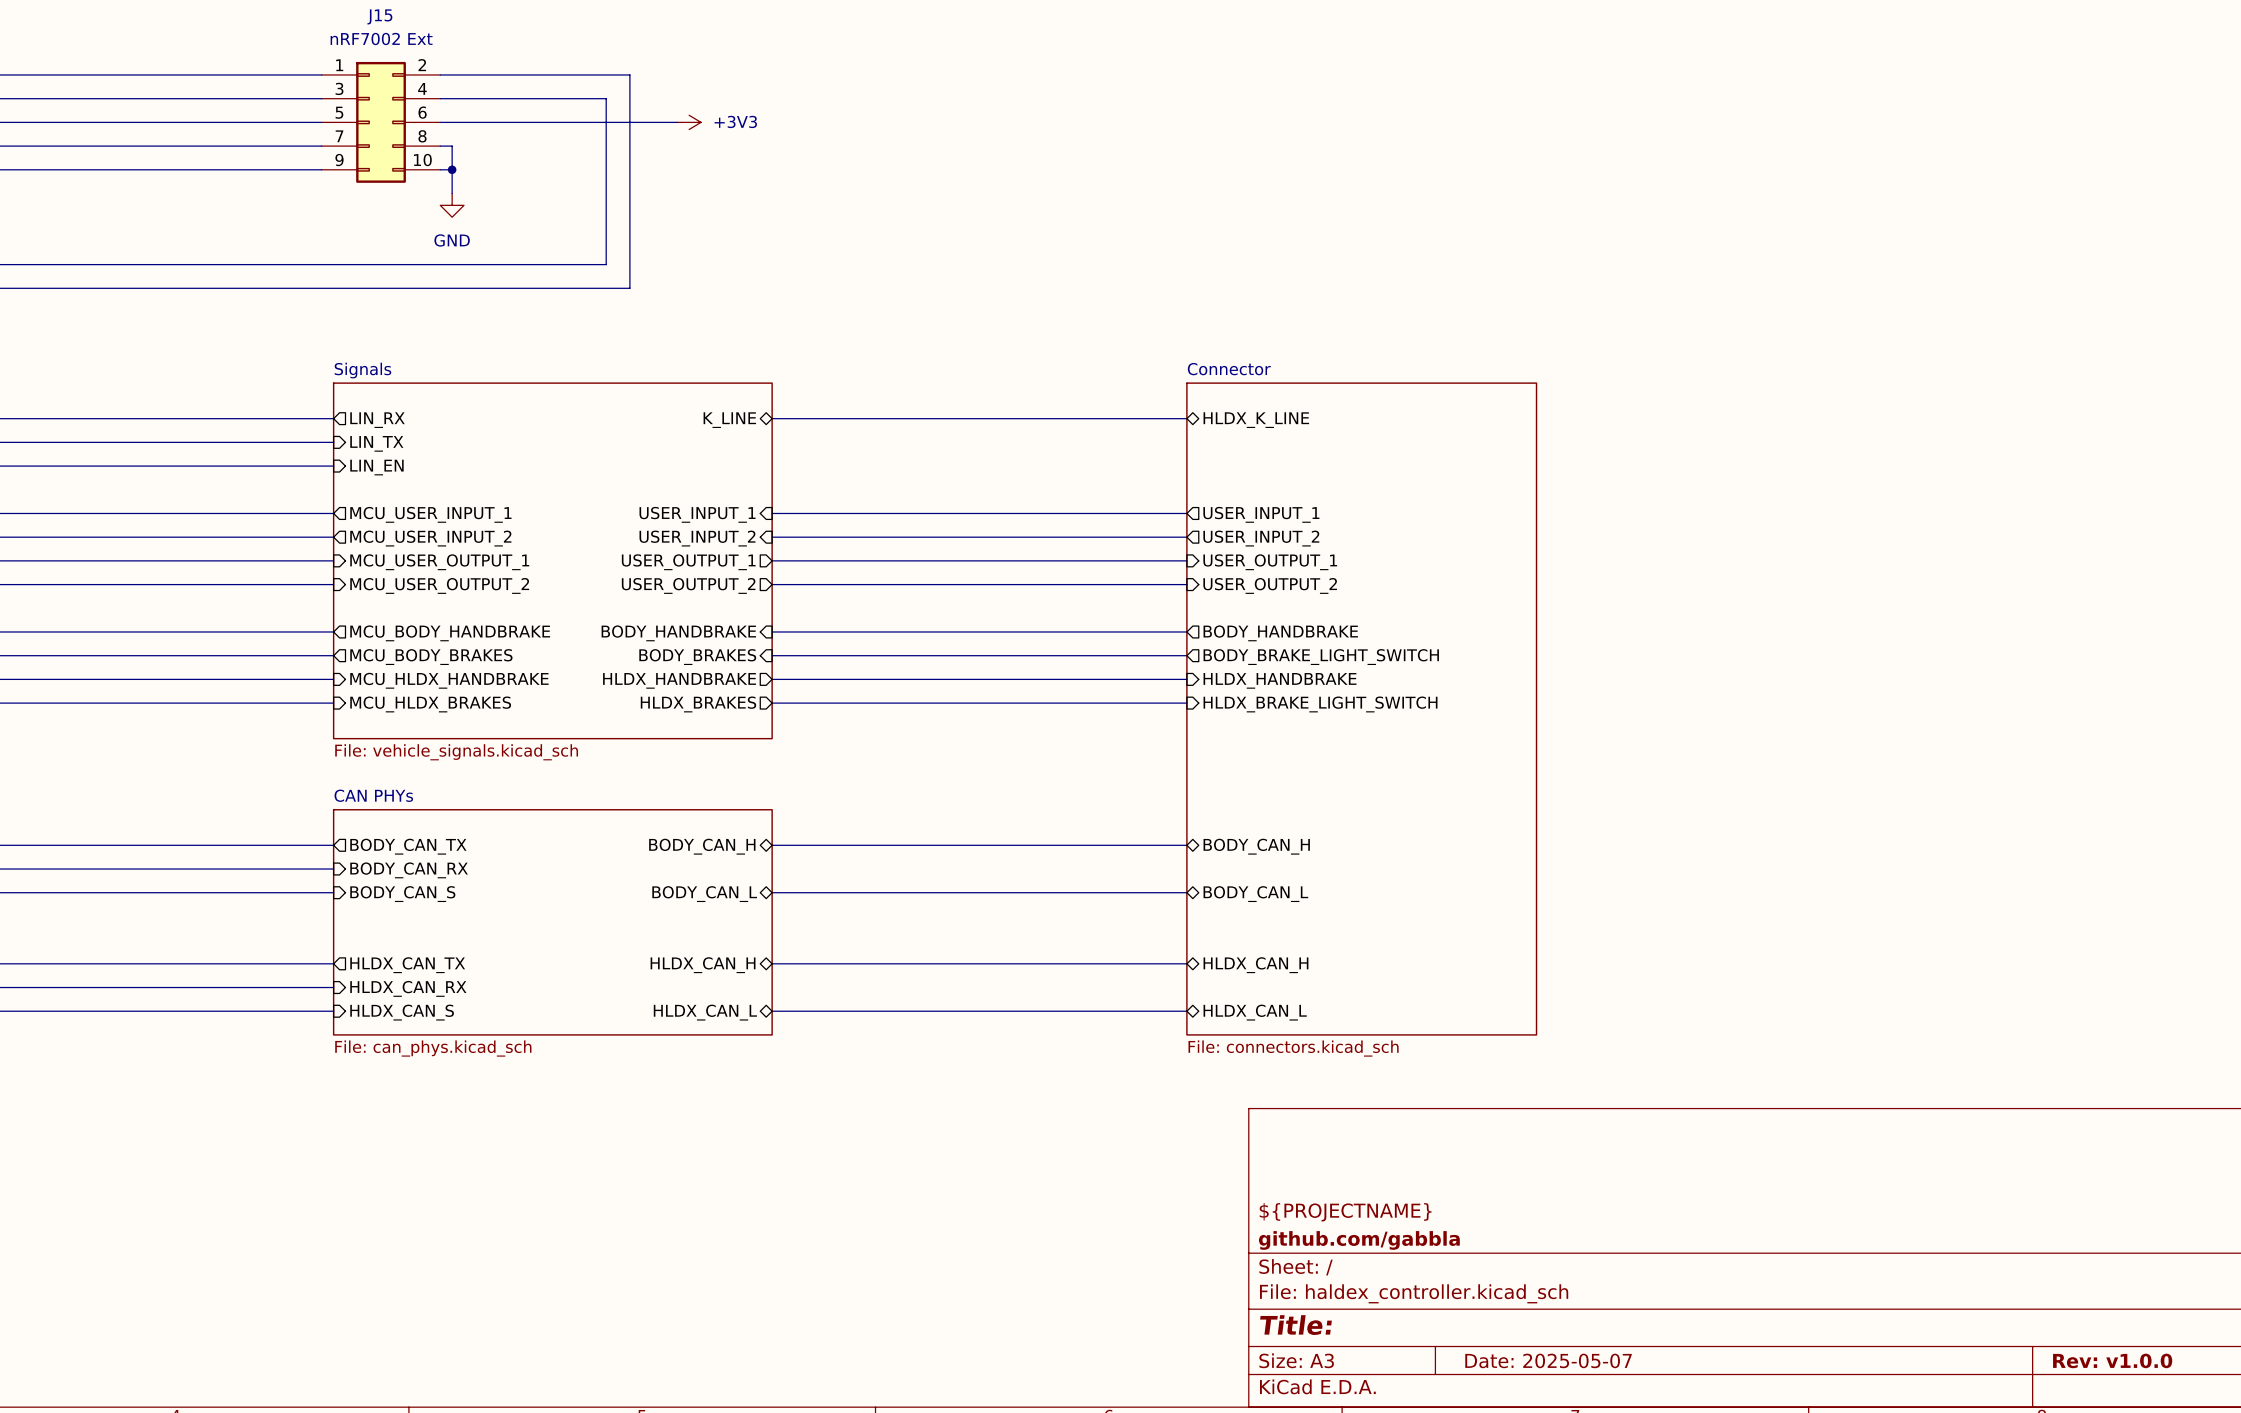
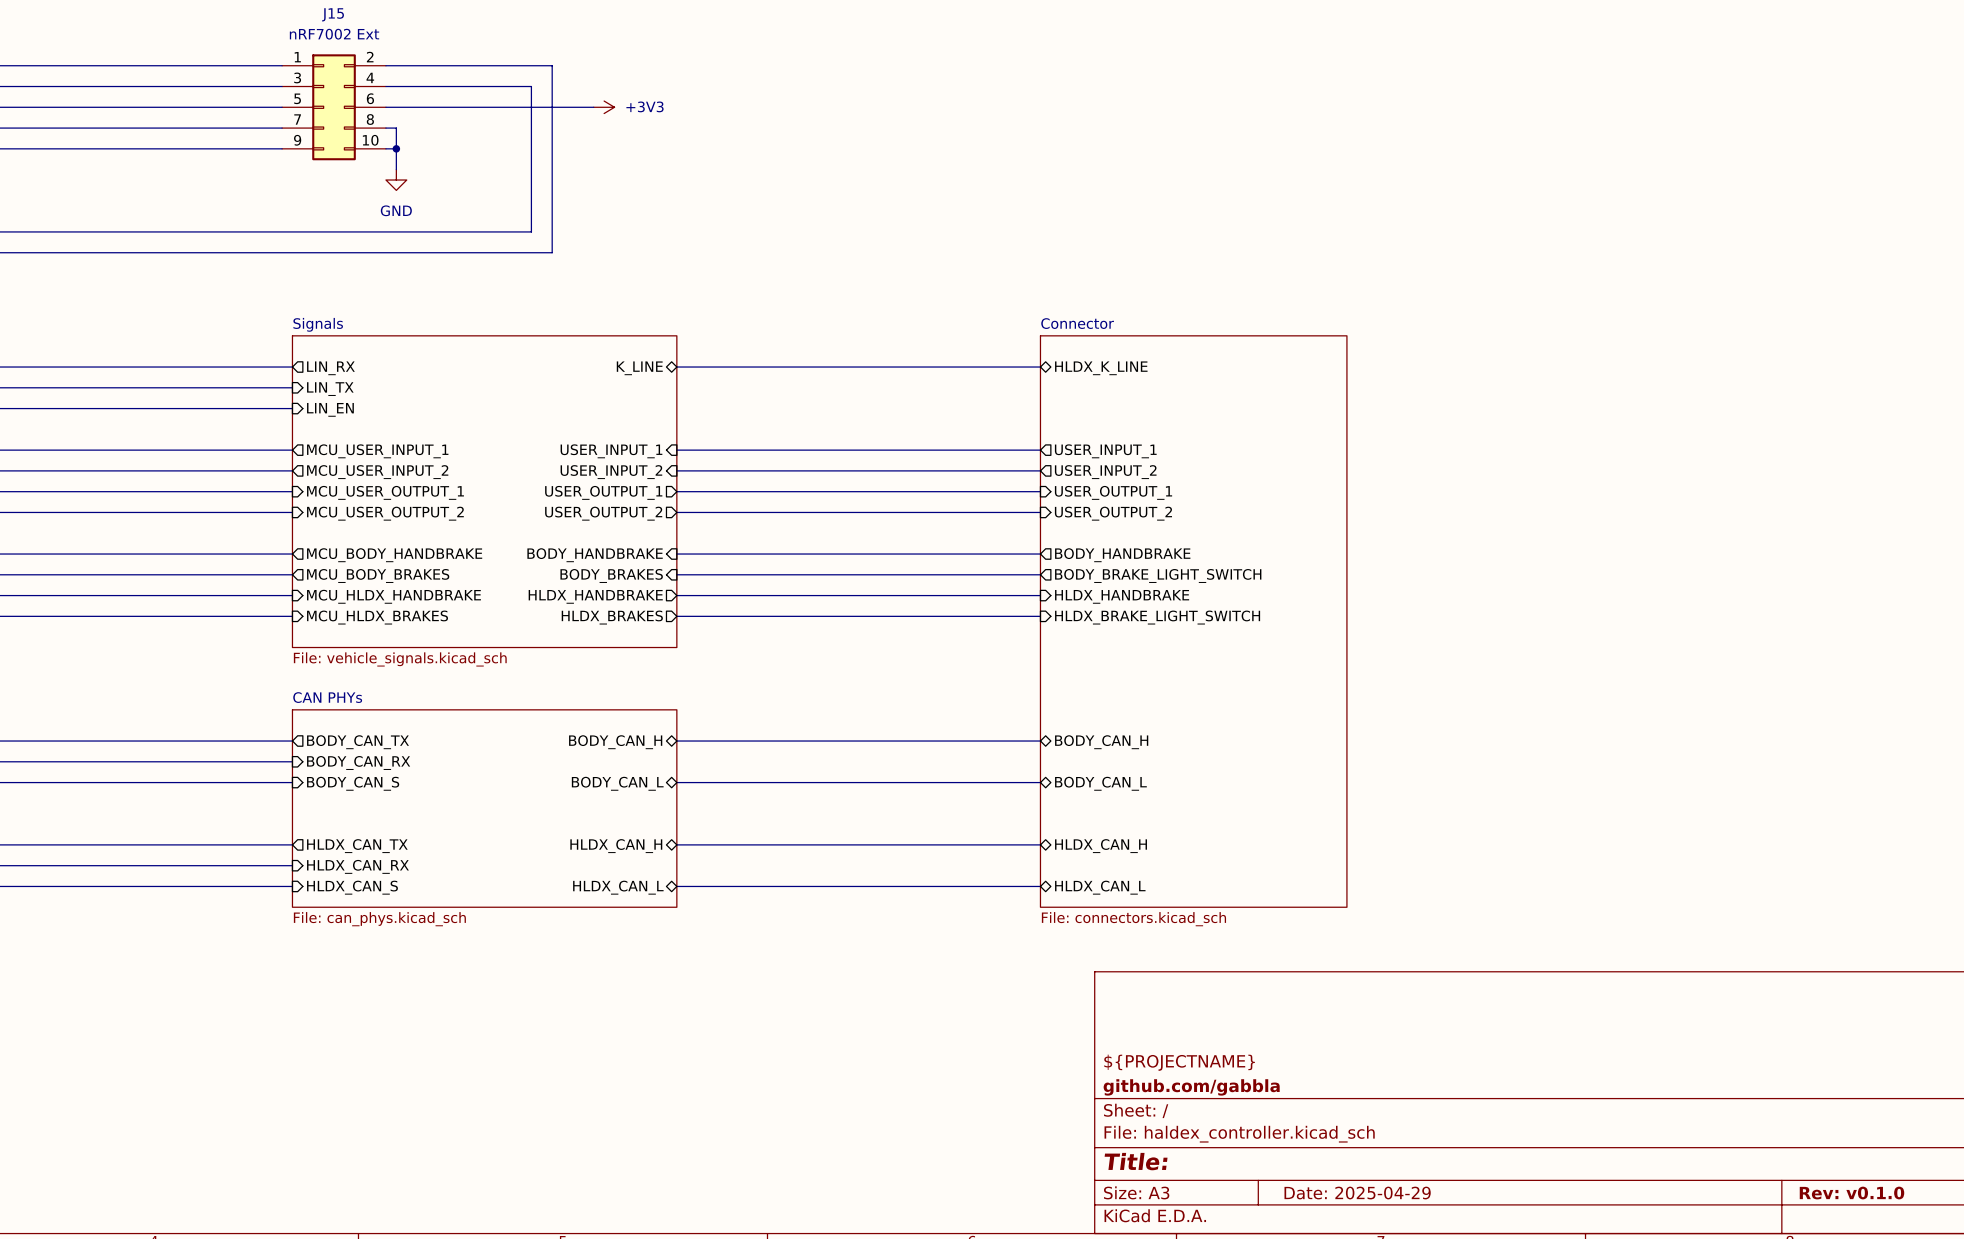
title block: Date: 2025-05-07 (1548, 1360) -> Date: 2025-04-29 (1357, 1193)
title block: Rev: v1.0.0 (2112, 1360) -> Rev: v0.1.0 (1851, 1193)

